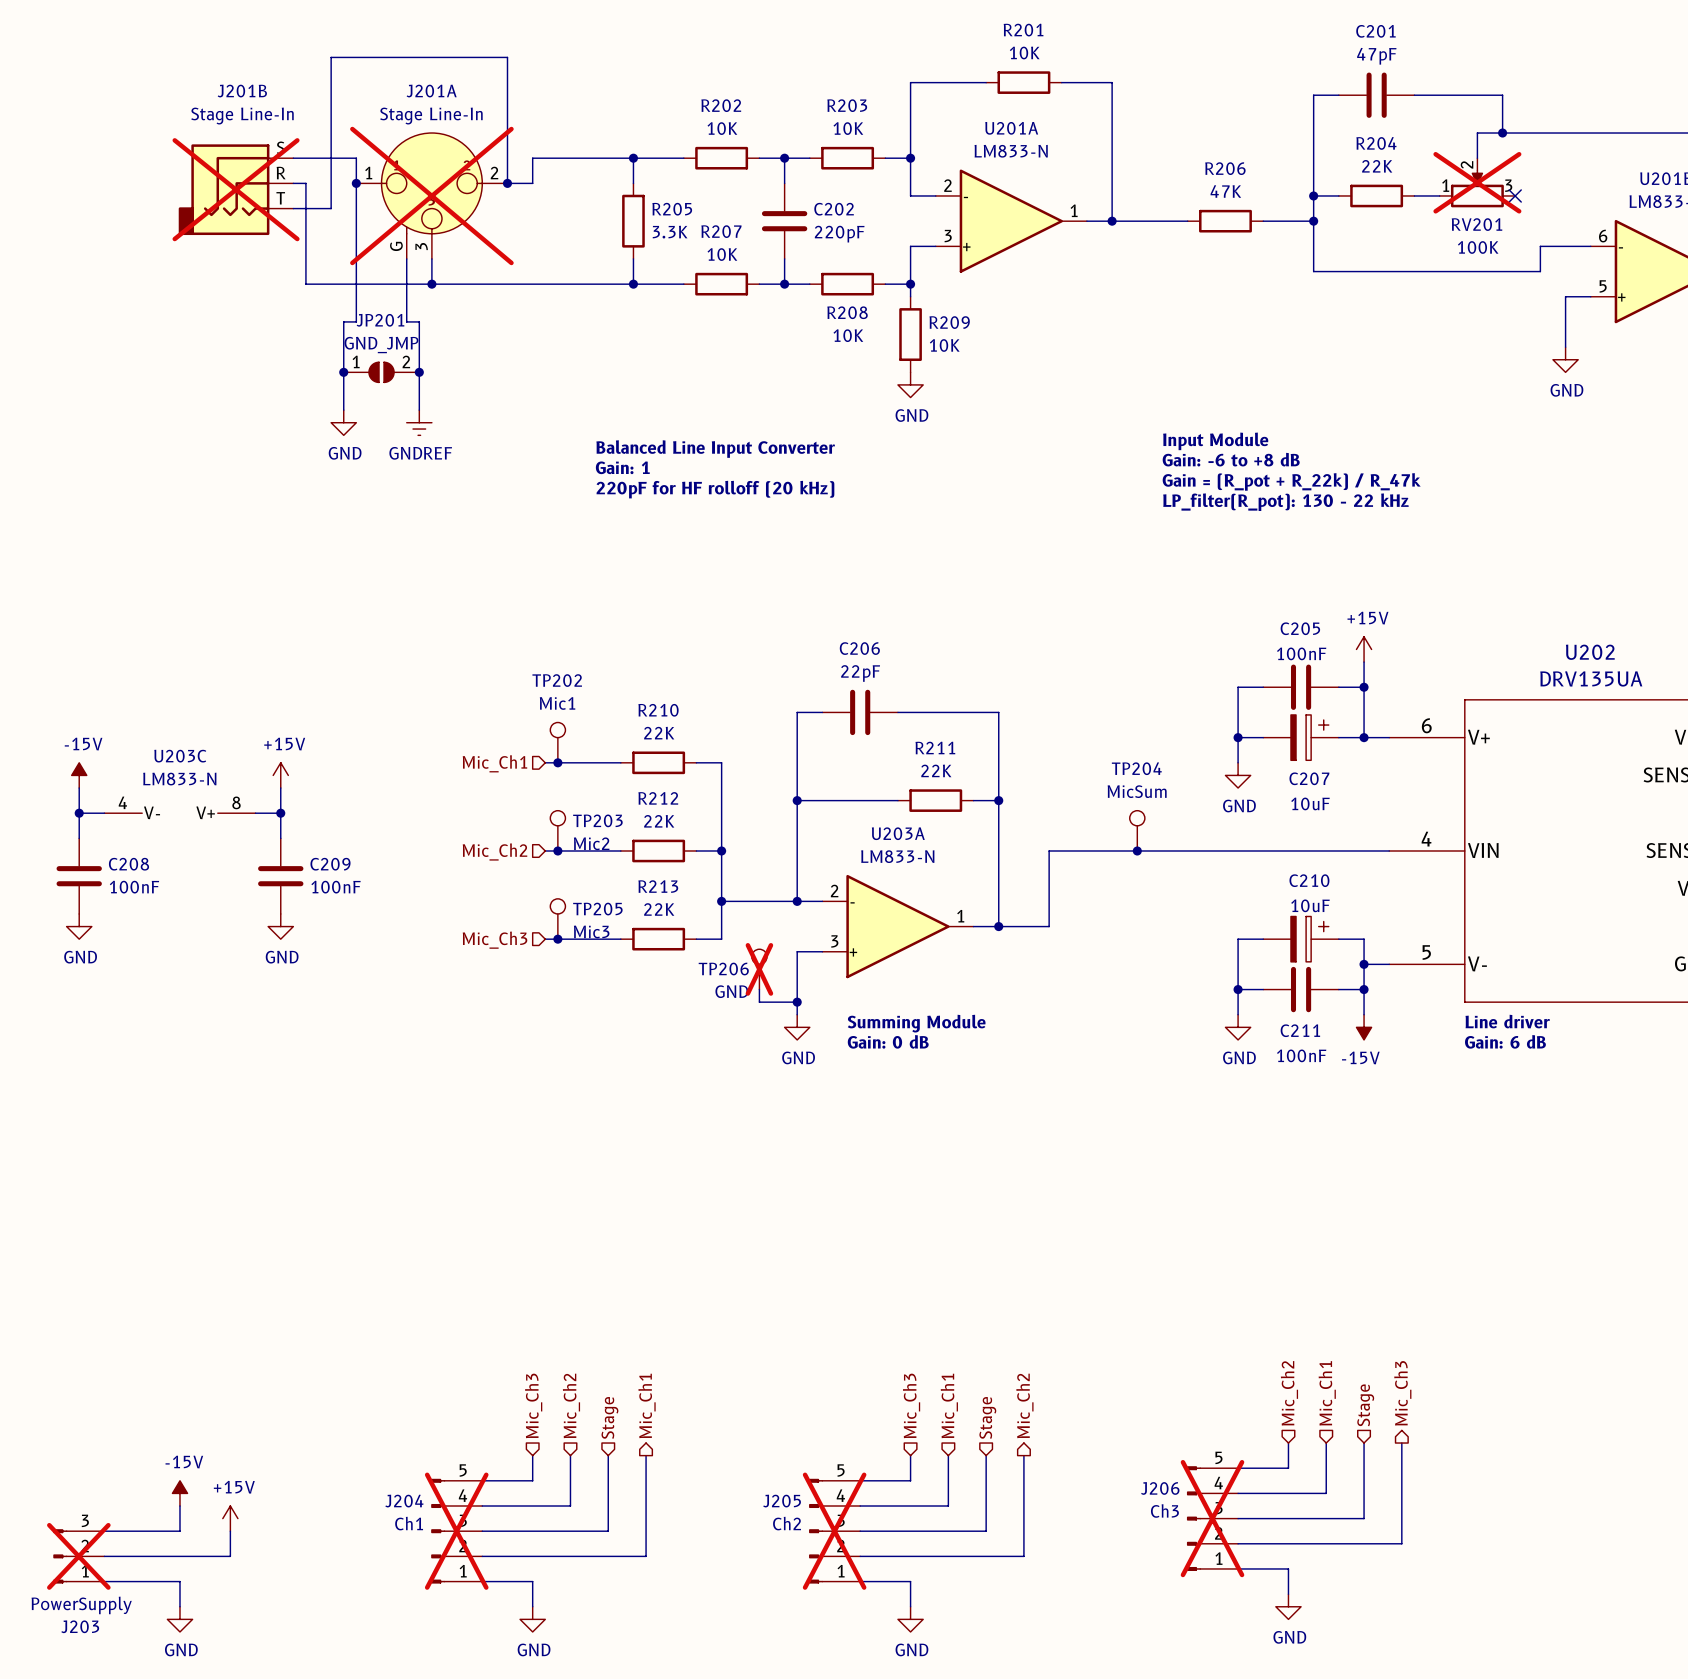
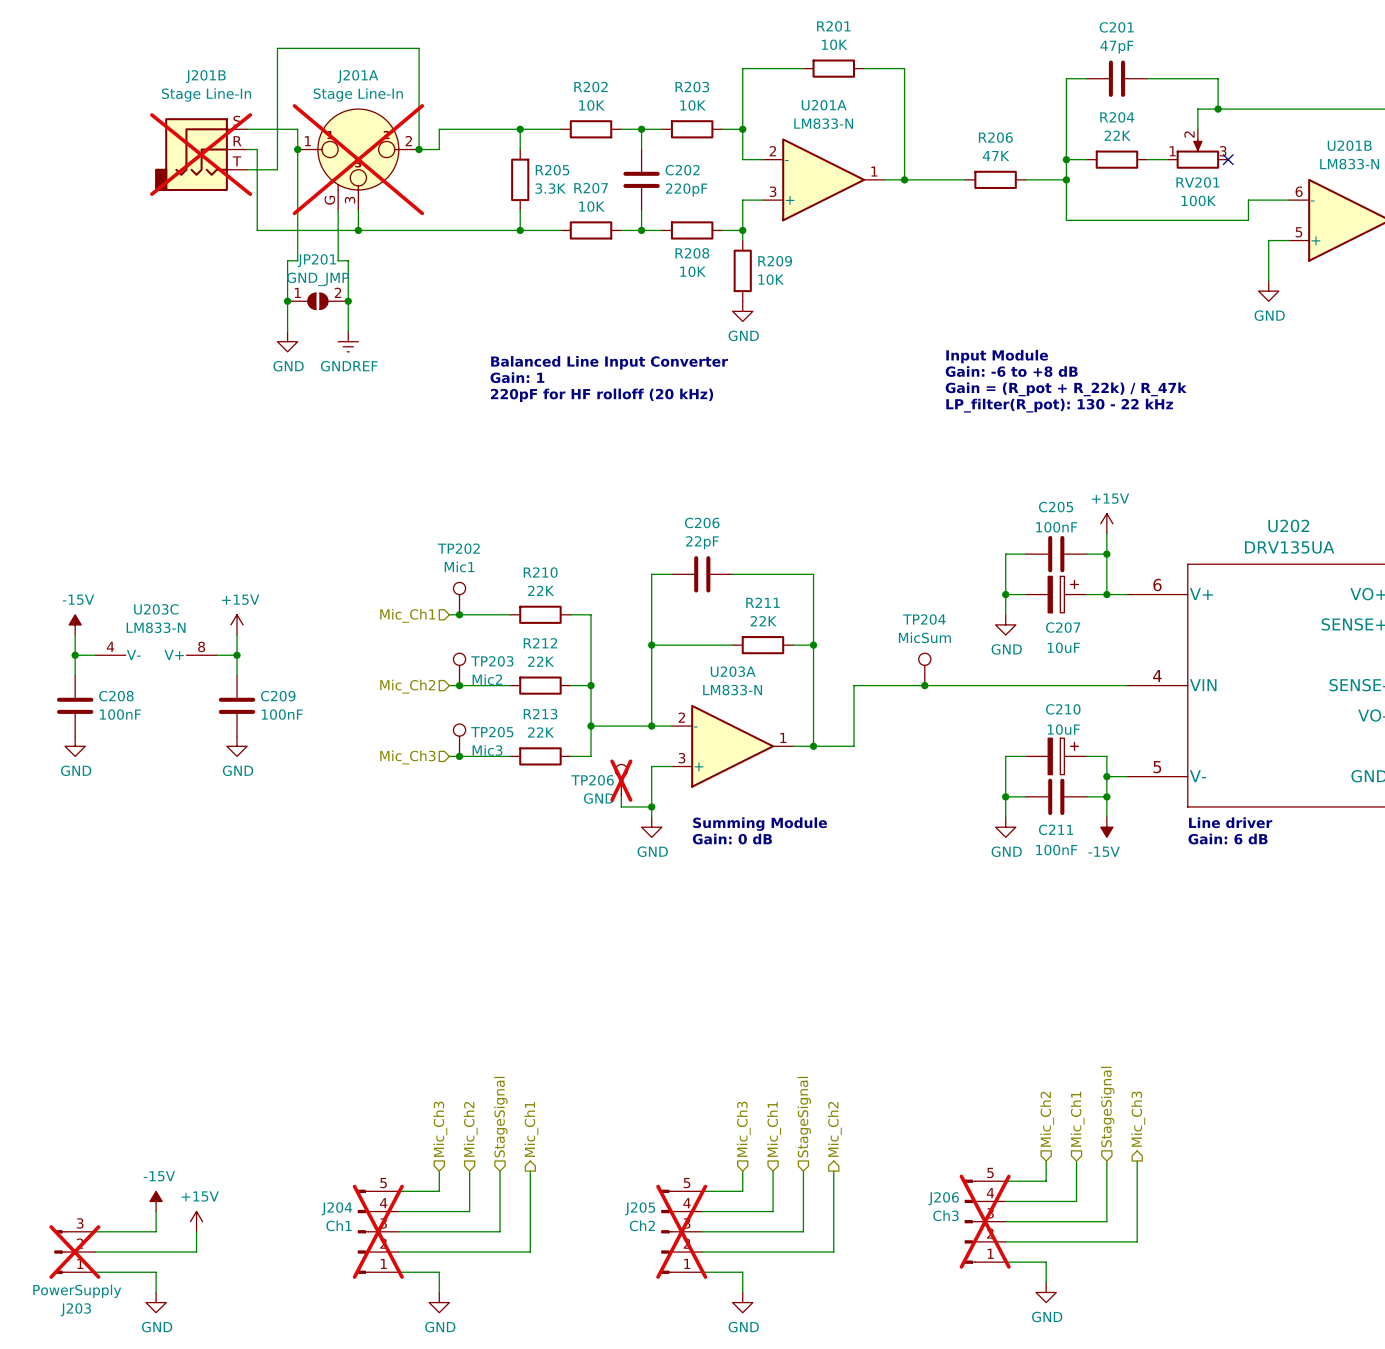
RV201 do-not-place cross: (1477, 182) -> none
hierarchical label: Stage (1365, 1405) -> StageSignal (1107, 1106)
hierarchical label: Stage (609, 1417) -> StageSignal (500, 1117)
hierarchical label: Stage (987, 1417) -> StageSignal (804, 1117)

